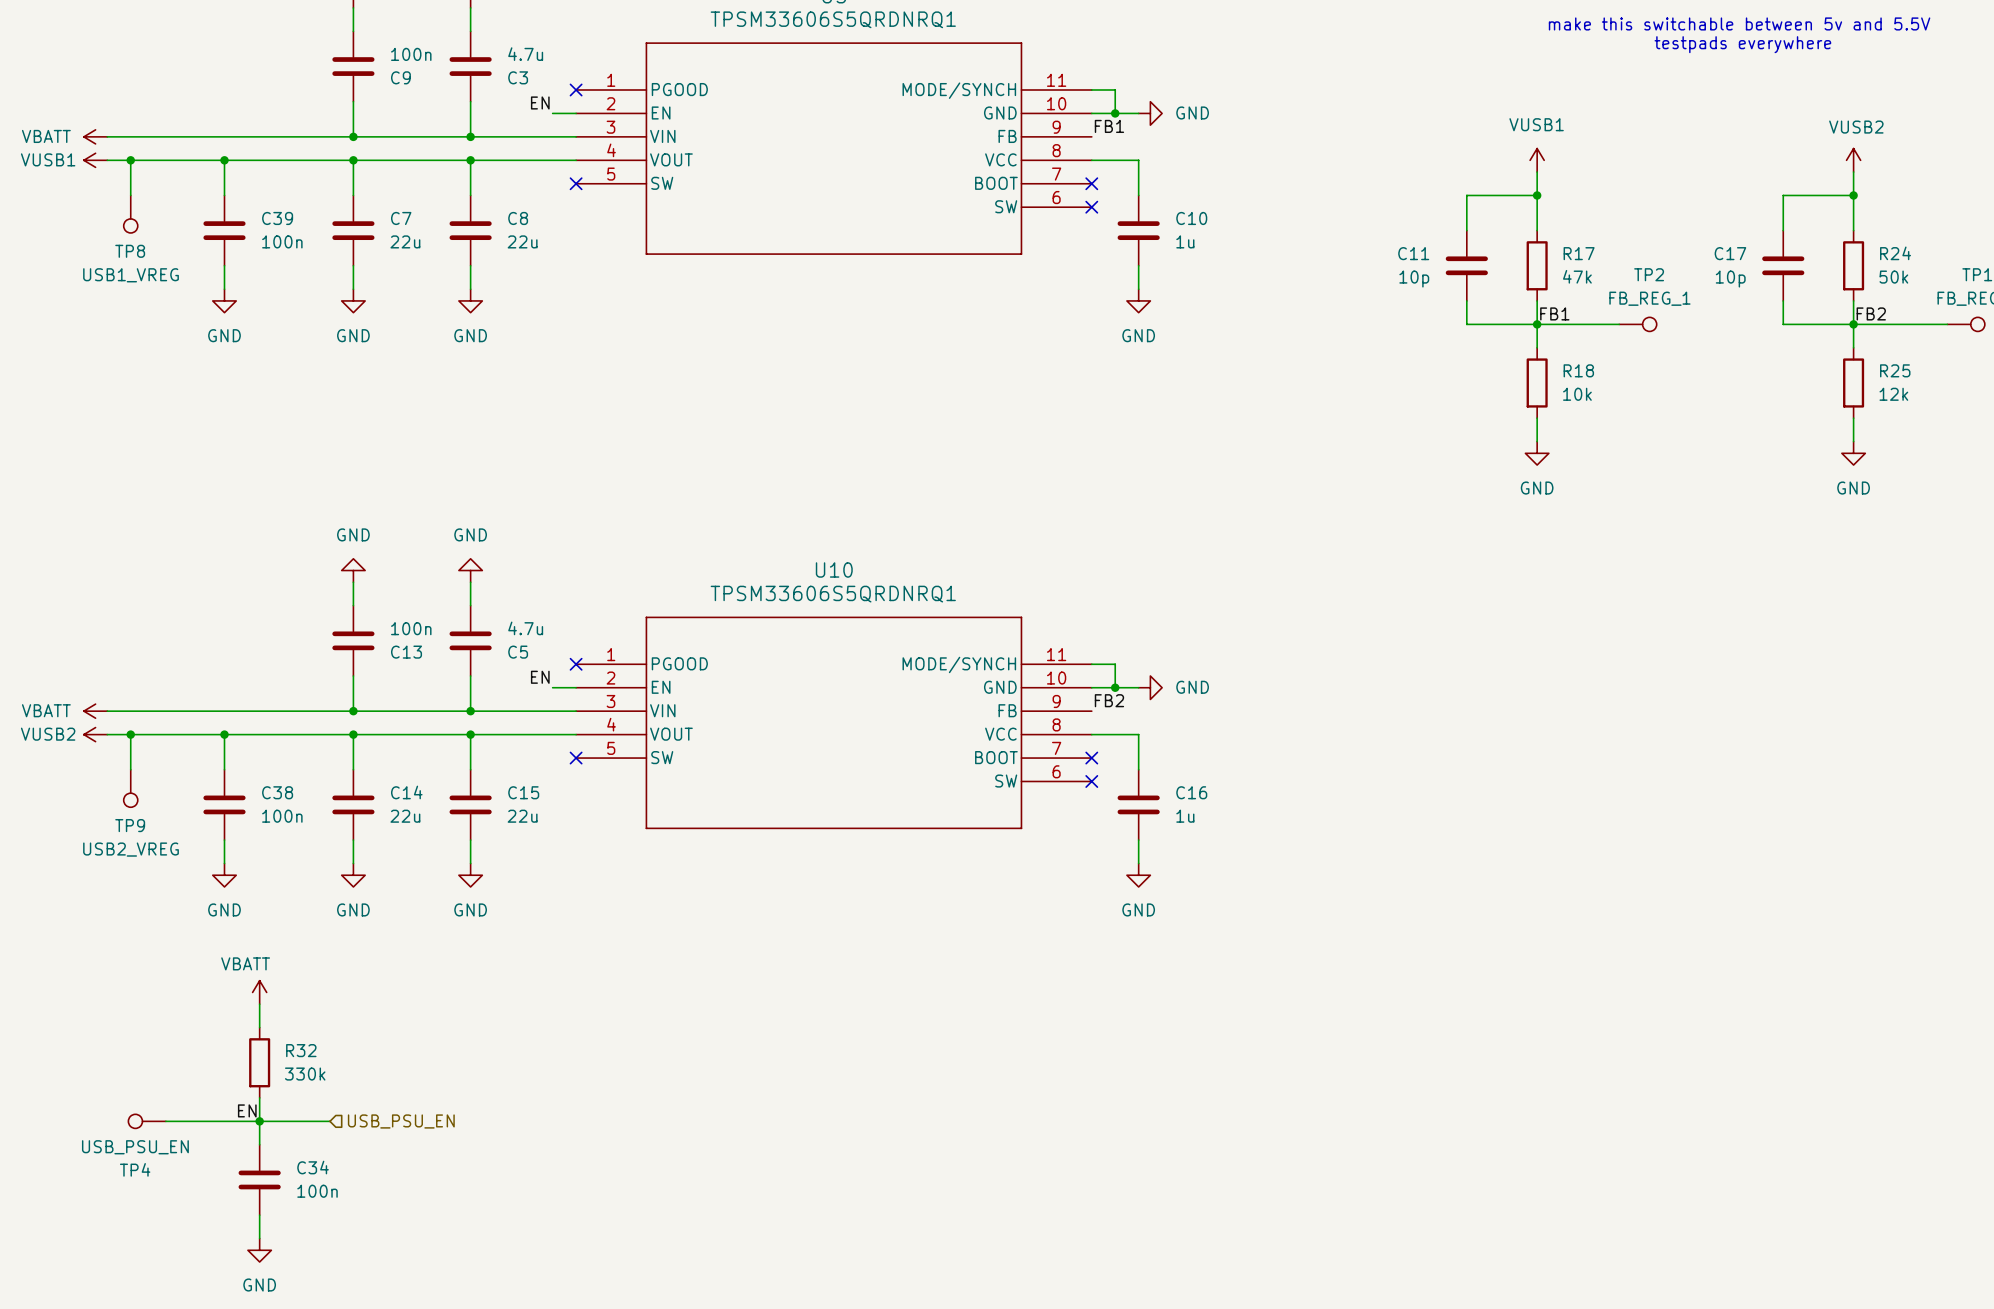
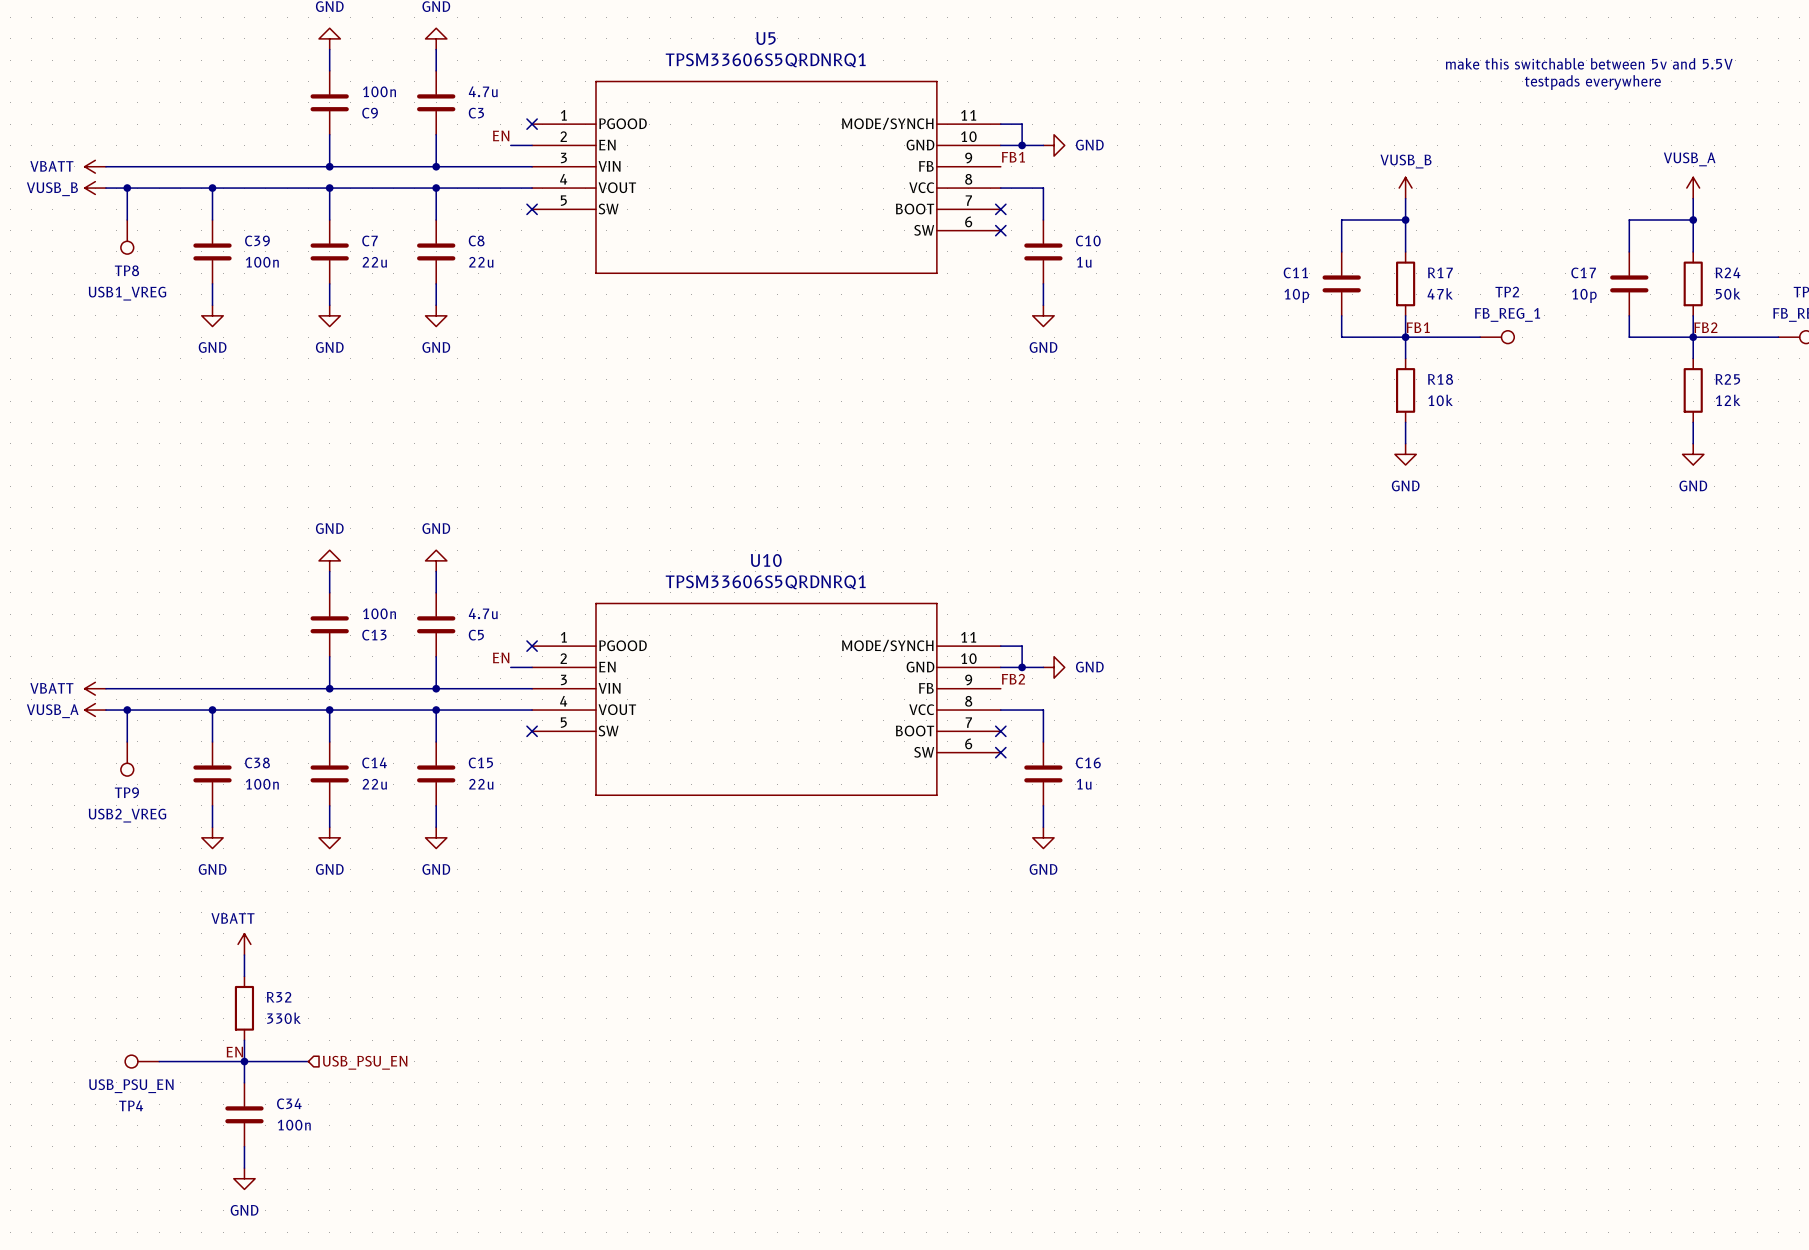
power symbol: VUSB1 (95, 160) -> VUSB_B (95, 188)
power symbol: VUSB1 (1537, 160) -> VUSB_B (1405, 188)
power symbol: VUSB2 (1853, 160) -> VUSB_A (1693, 188)
power symbol: VUSB2 (95, 734) -> VUSB_A (95, 710)

